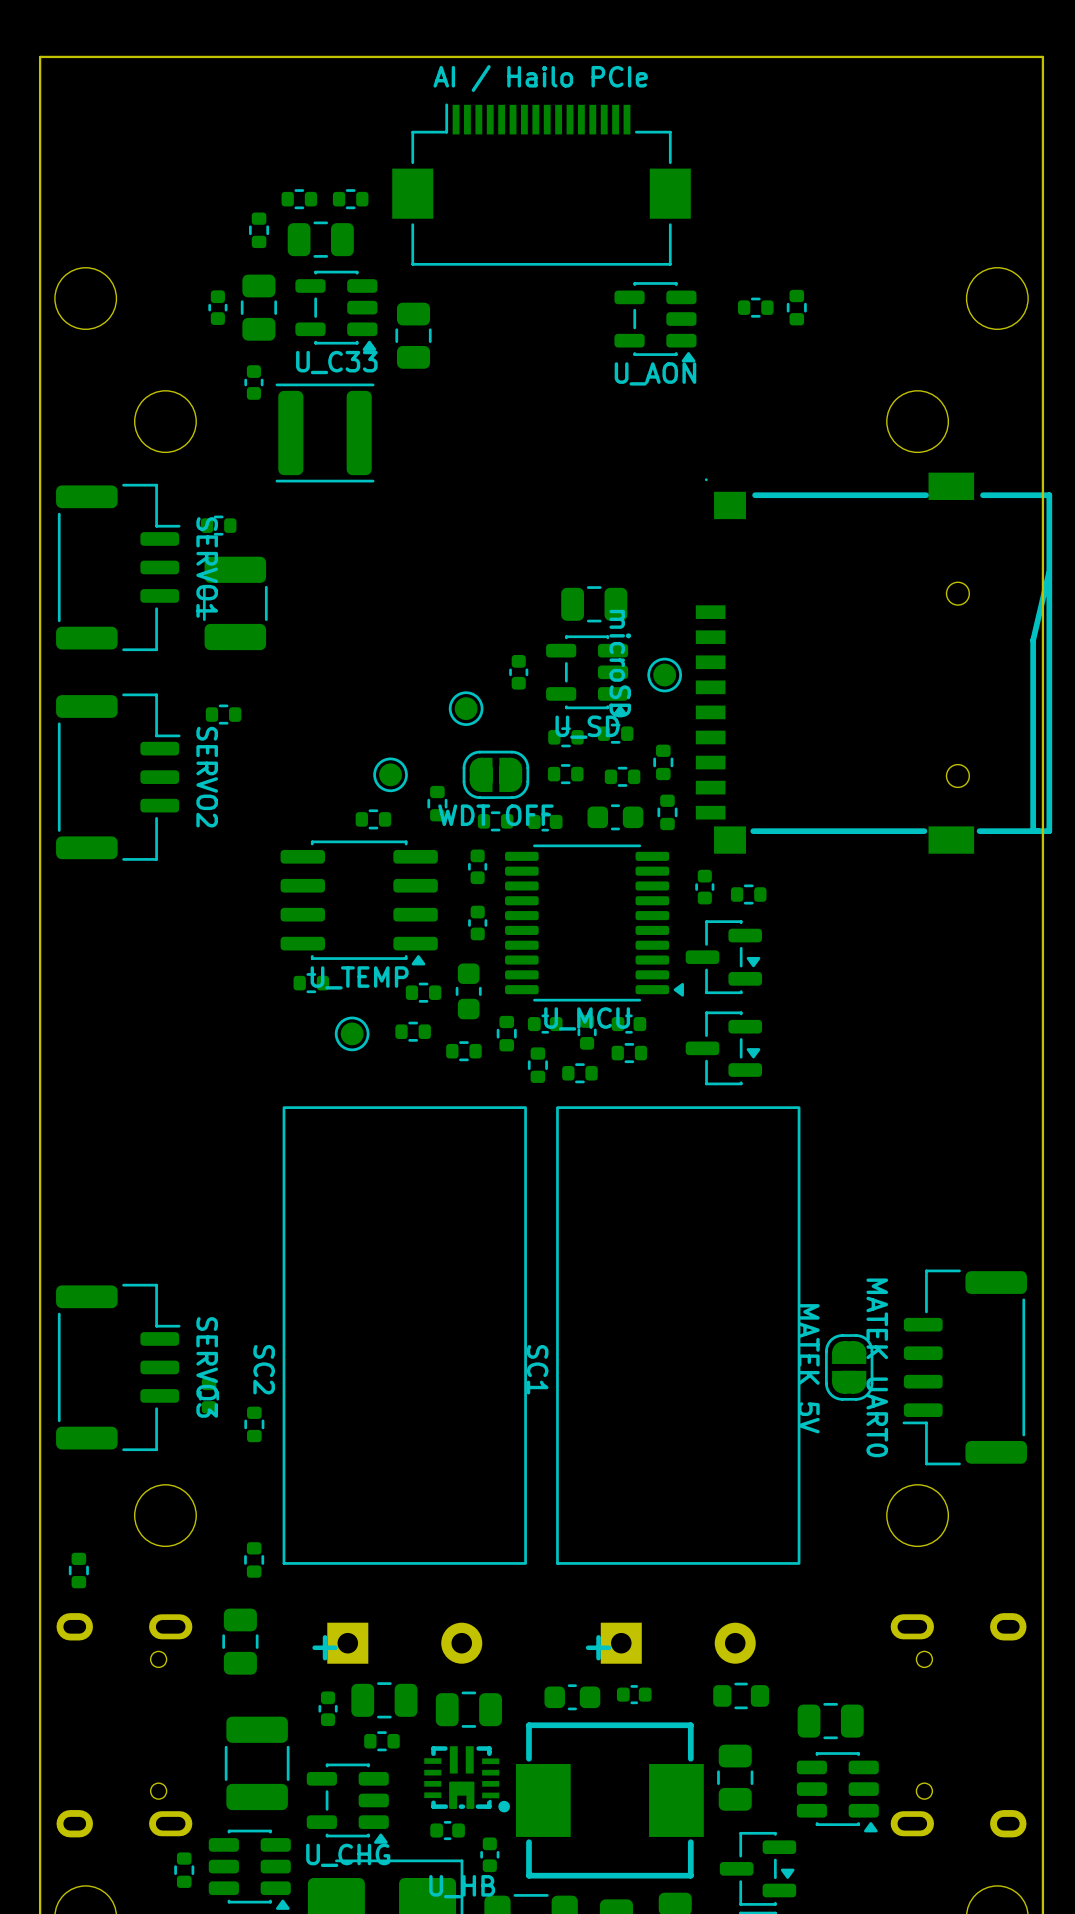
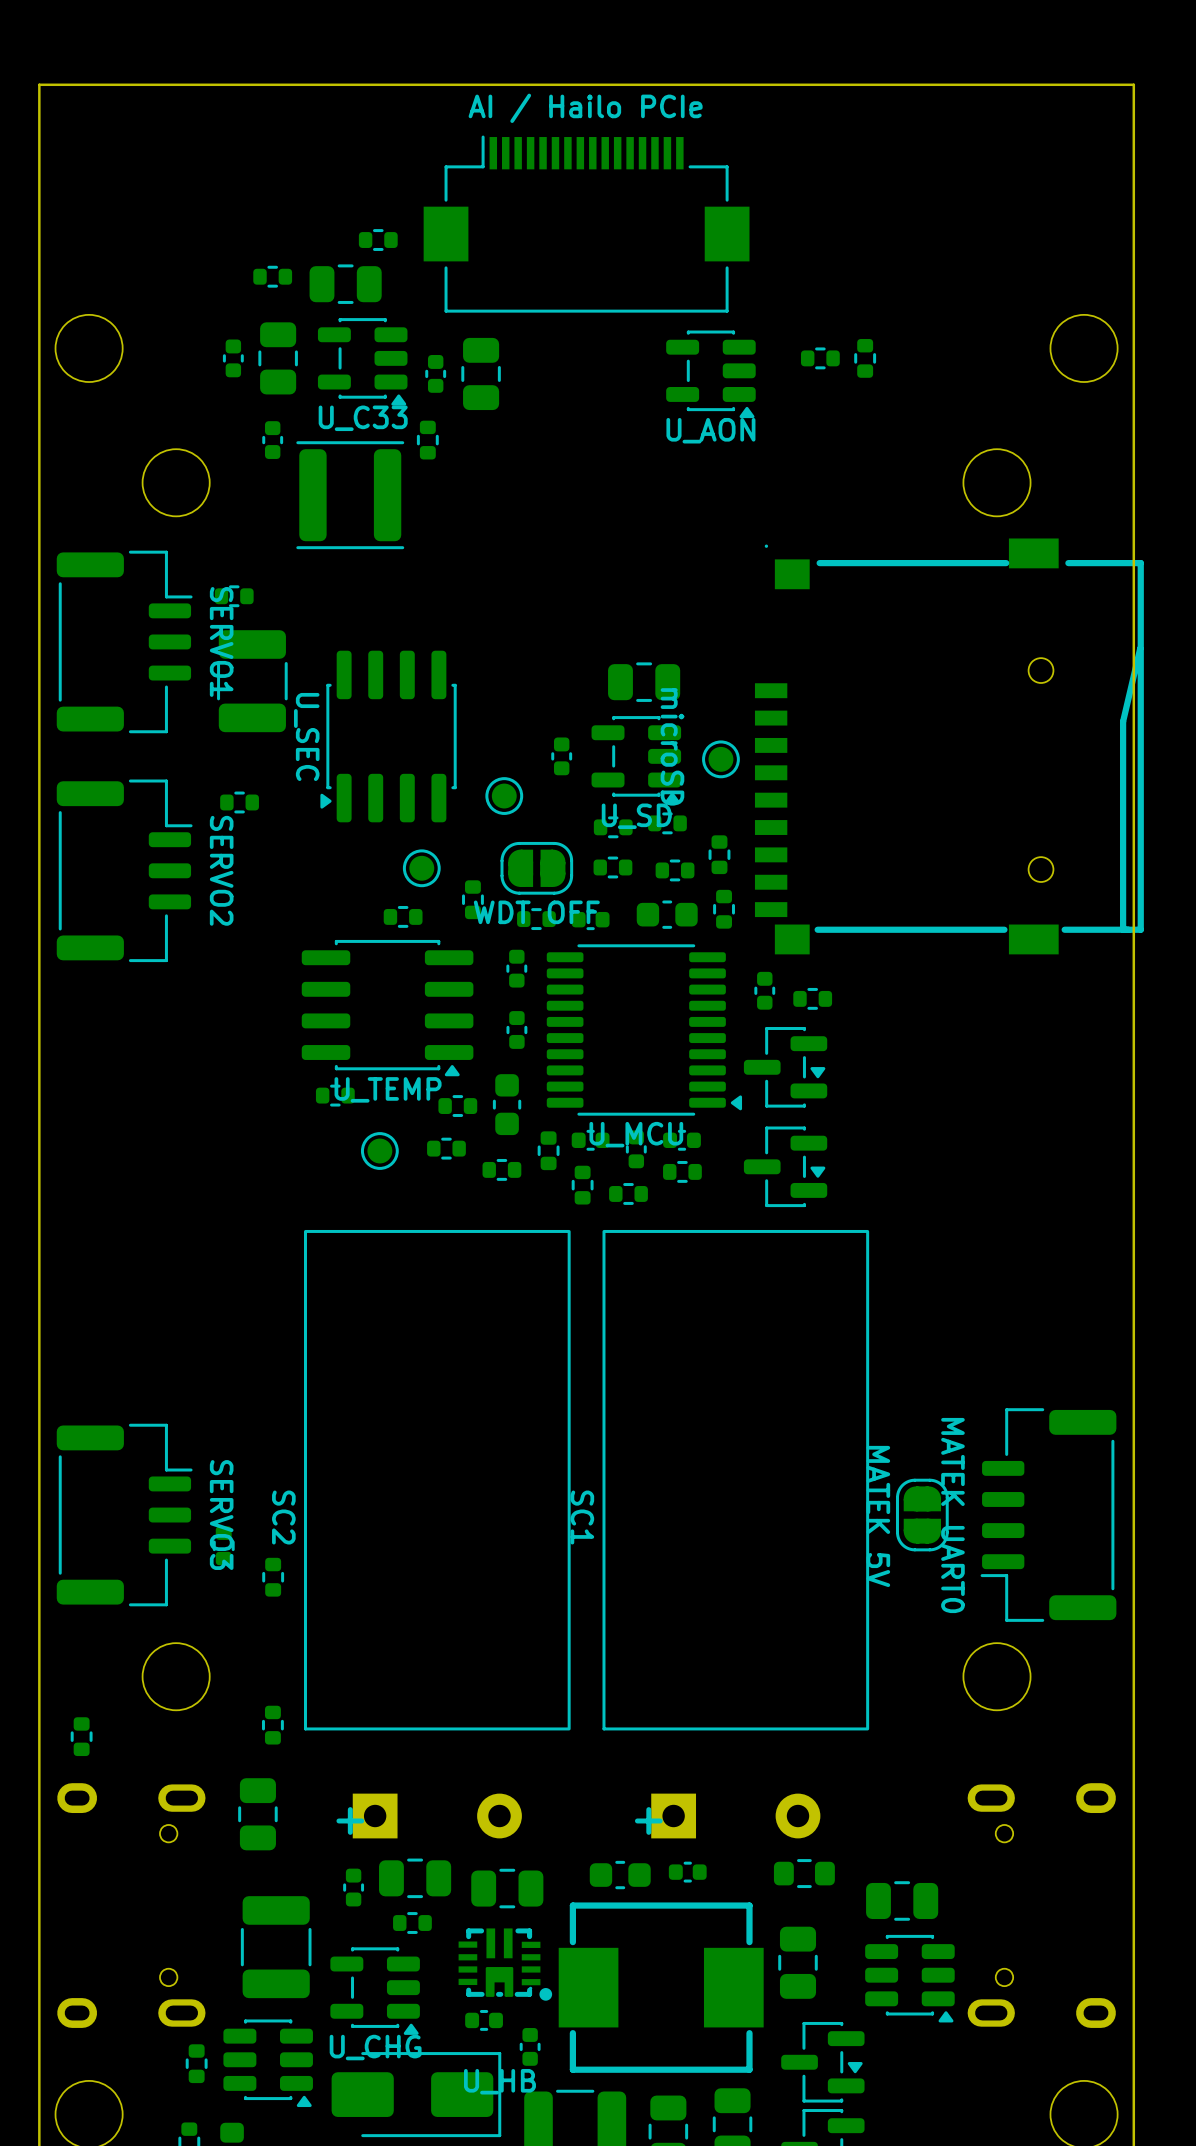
part rotation: 0° (299, 199) -> 90° clockwise (427, 440)
part position: (299, 199) -> (427, 440)
part rotation: 0° (259, 230) -> 90° clockwise (272, 276)
part: none -> (435, 373)
part position: (413, 335) -> (481, 373)
U_SEC: none -> (388, 736)

